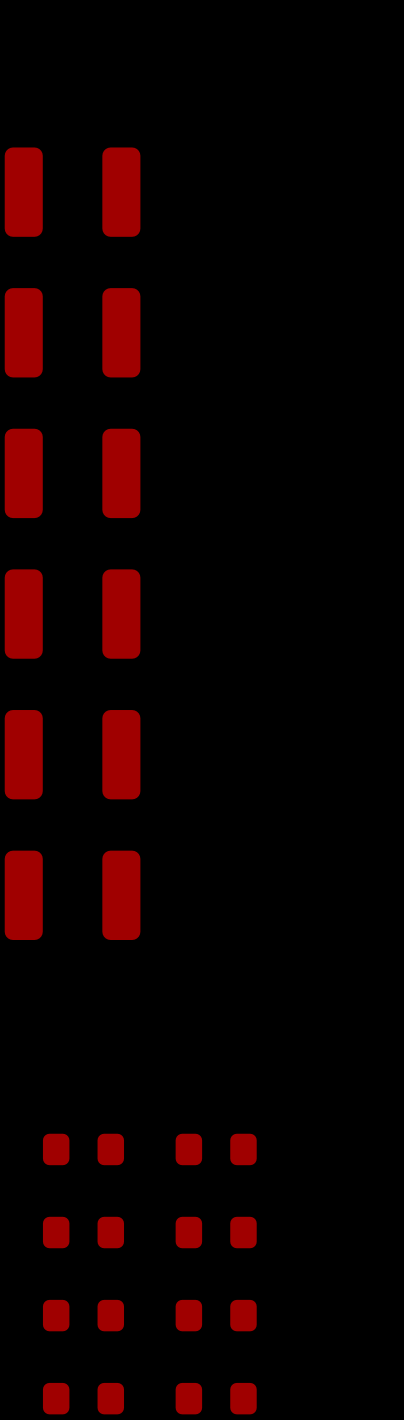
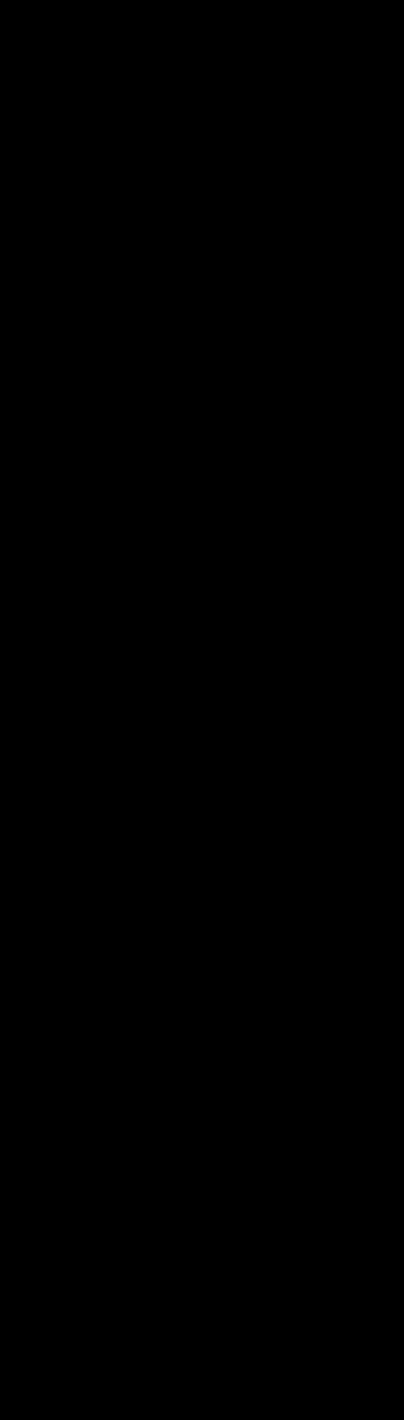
part: (72, 192) -> none
part: (72, 332) -> none
part: (72, 473) -> none
part: (72, 614) -> none
part: (72, 754) -> none
part: (72, 895) -> none
part: (83, 1149) -> none
part: (216, 1149) -> none
part: (83, 1232) -> none
part: (216, 1232) -> none
part: (83, 1315) -> none
part: (216, 1315) -> none
part: (83, 1398) -> none
part: (216, 1398) -> none

